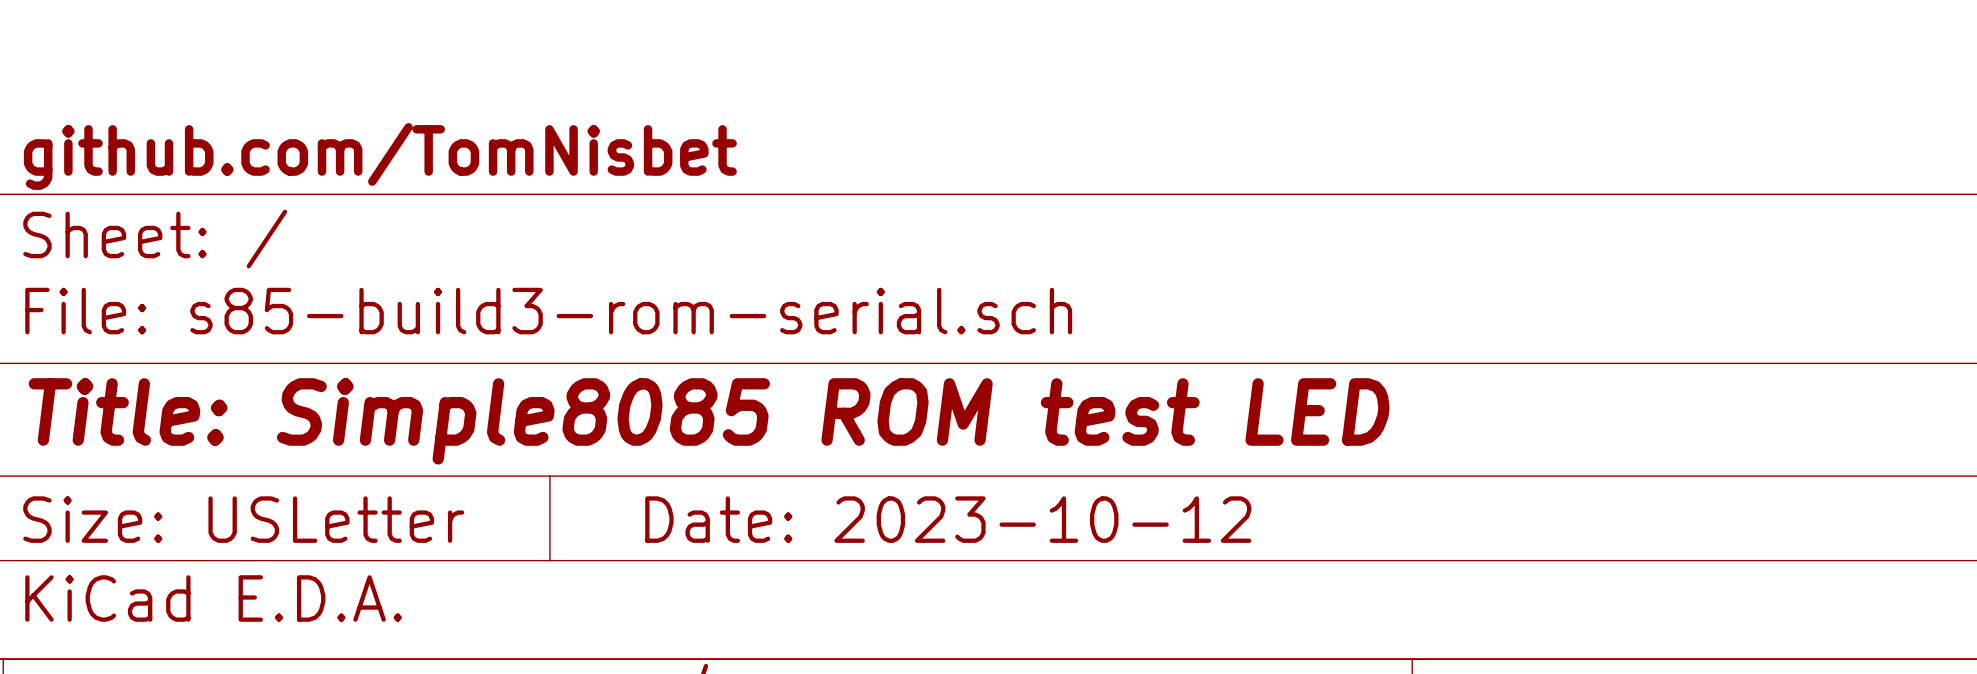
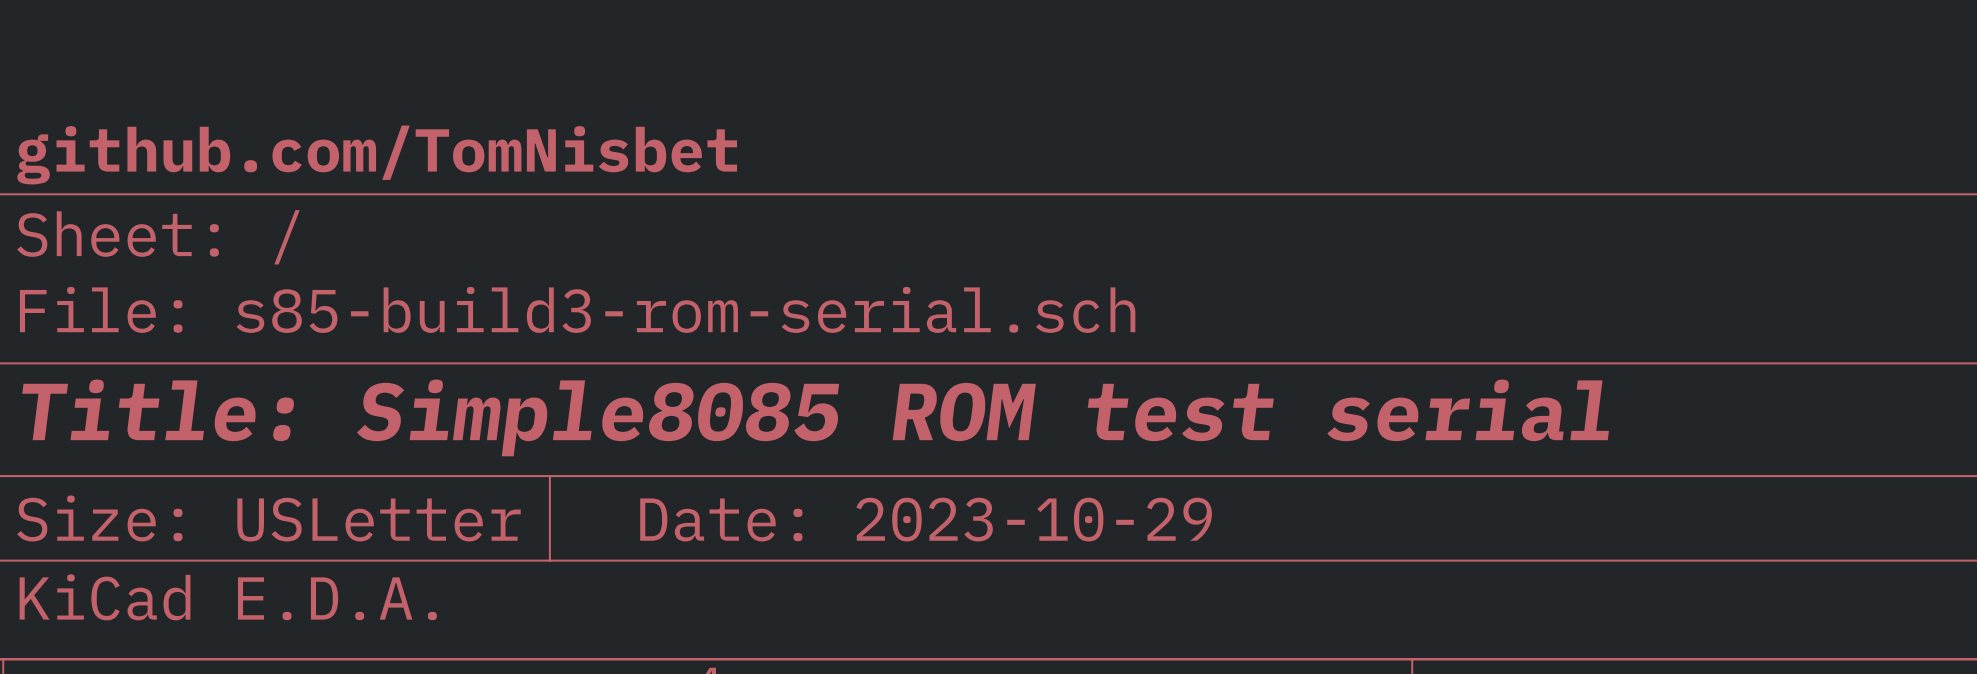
title block: Title: Simple8085 ROM test LED (709, 421) -> Title: Simple8085 ROM test serial (815, 417)
title block: Date: 2023-10-12 (948, 519) -> Date: 2023-10-29 (926, 519)

